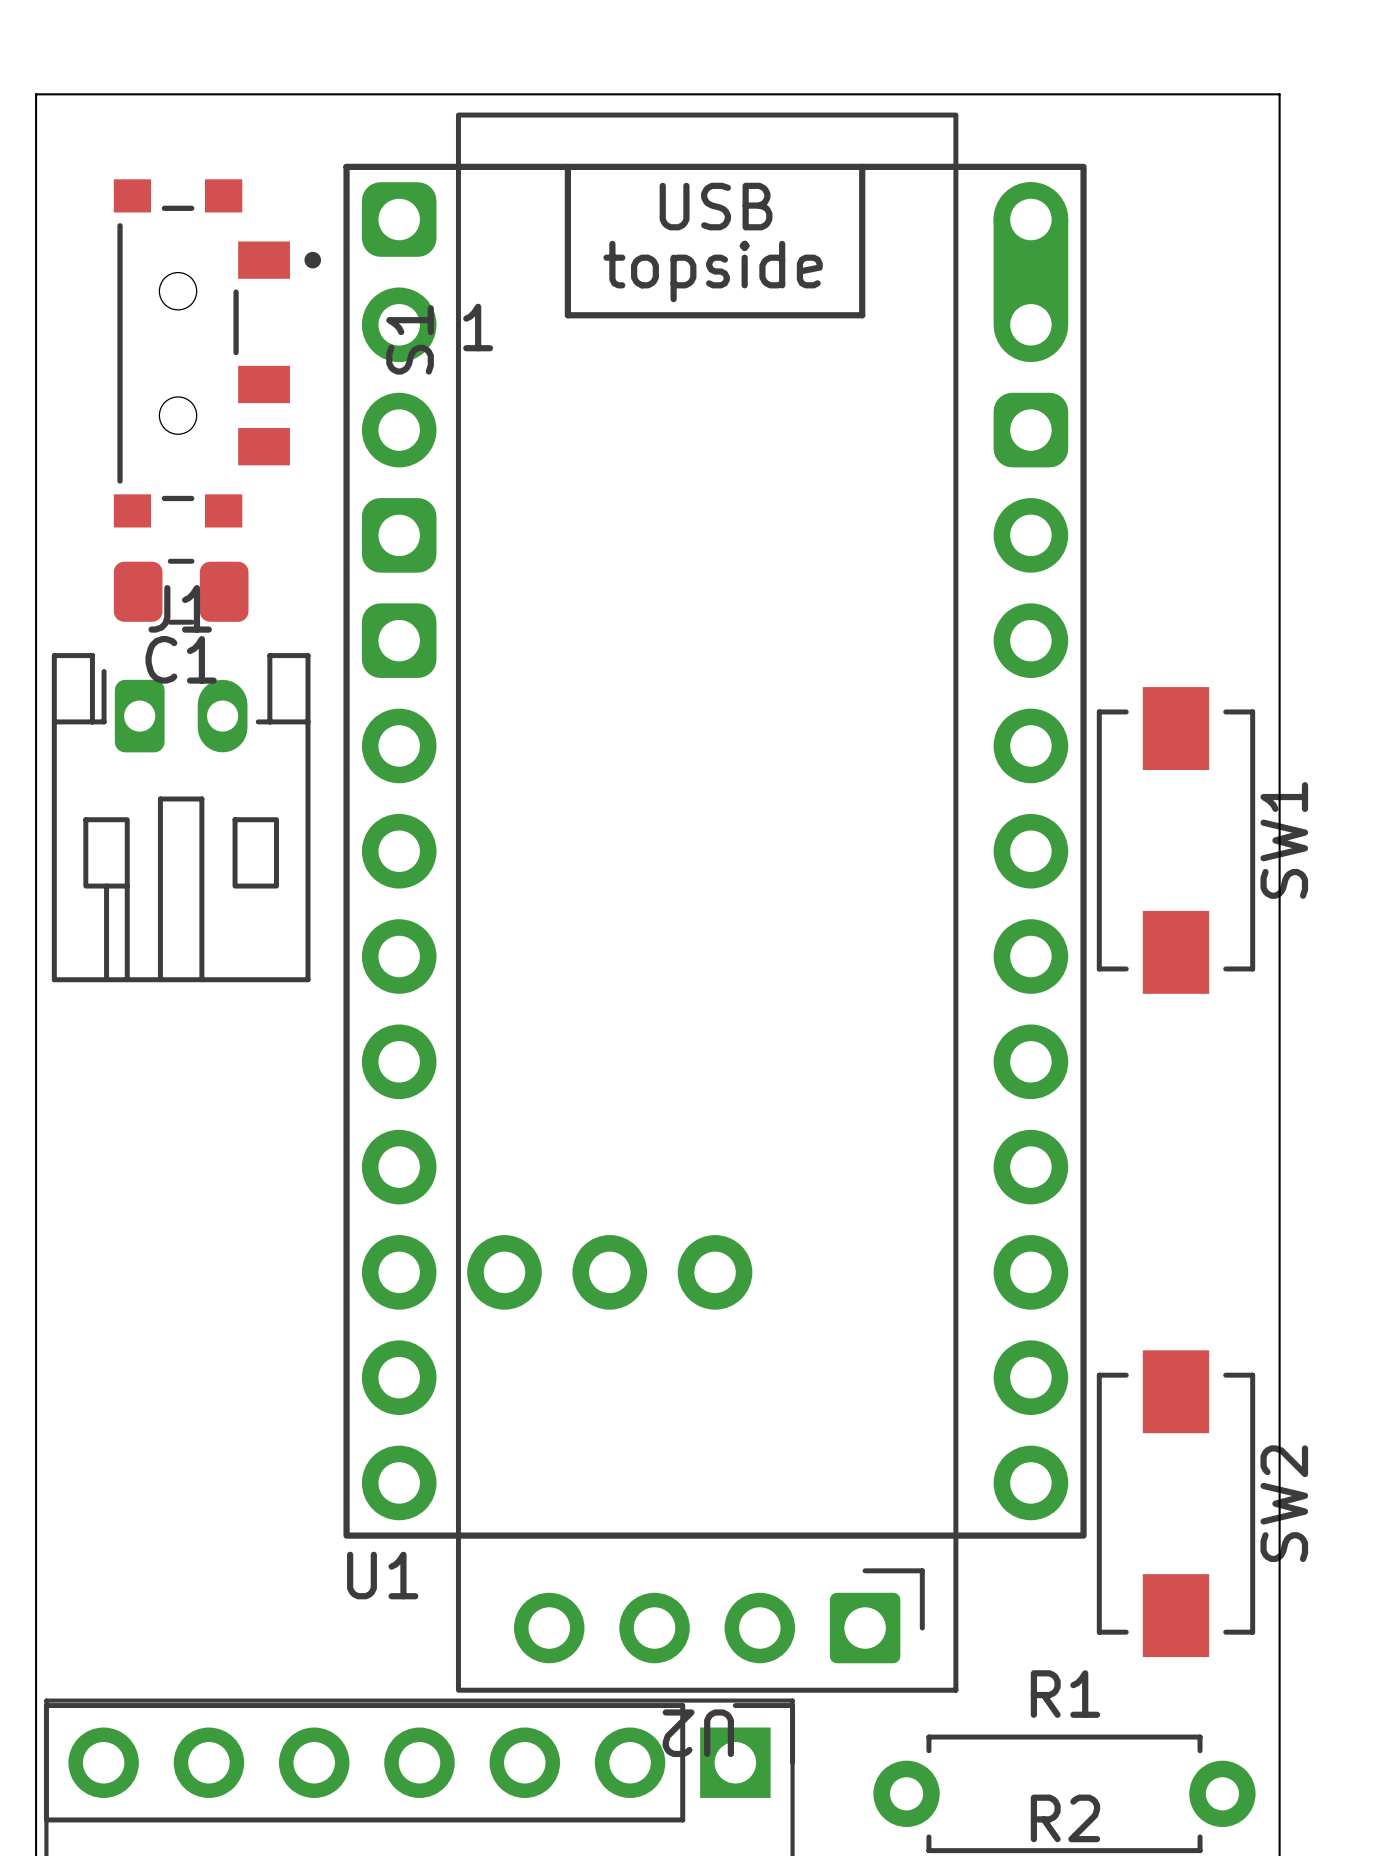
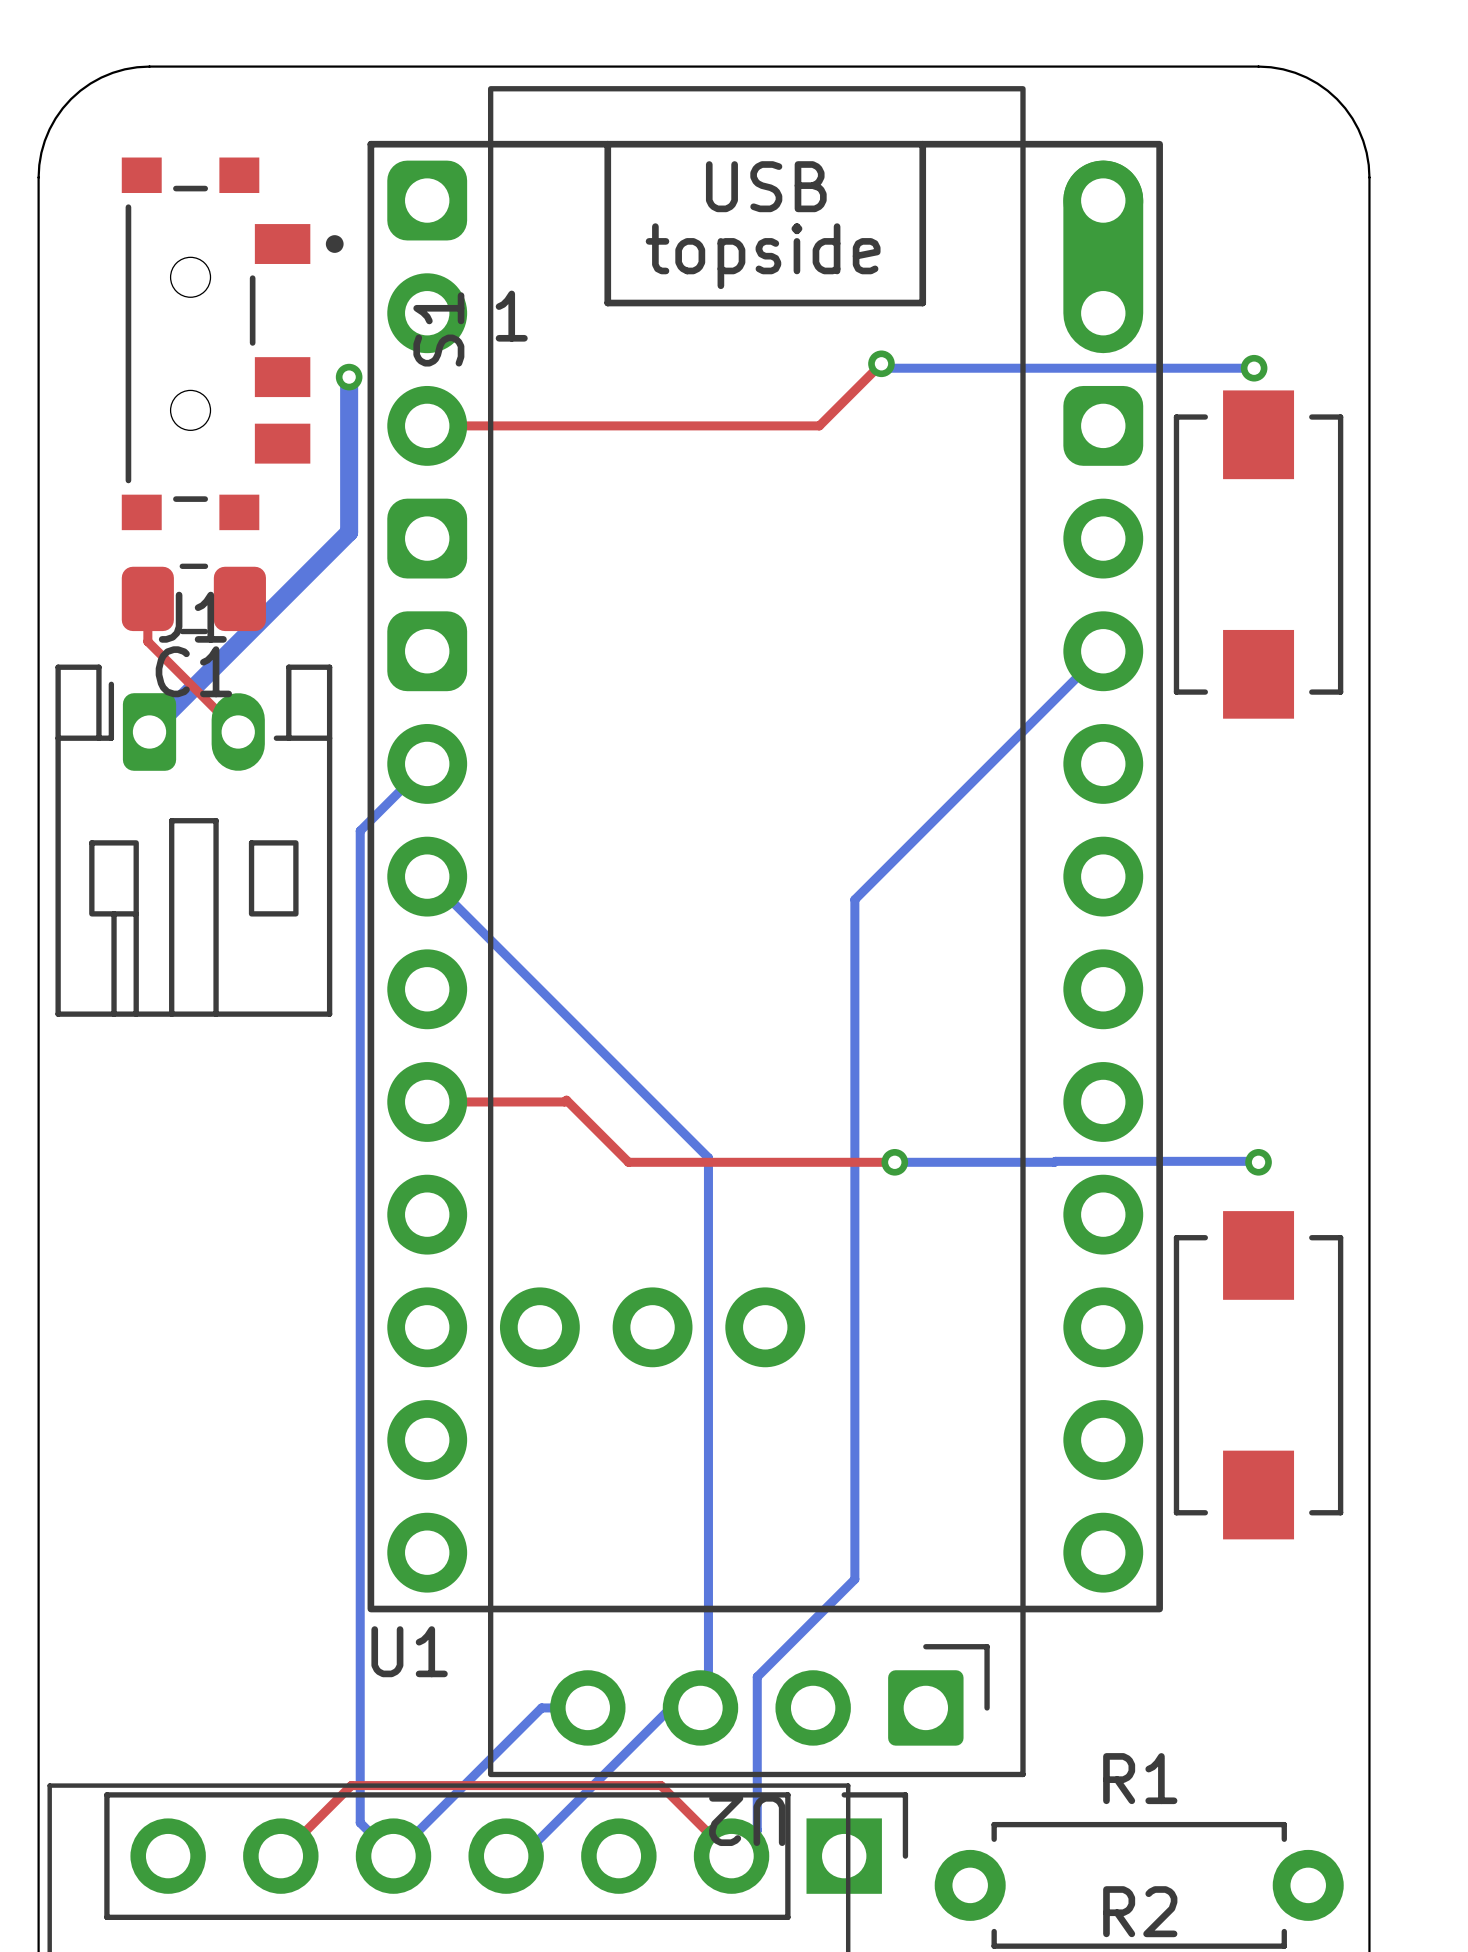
board edge: (139, 94) (36, 94) (36, 197) -> (149, 66) (112, 72) (90, 83) (71, 99) (55, 118) (44, 140) (38, 177)
board edge: (1175, 94) (1279, 94) (1279, 197) -> (1258, 66) (1295, 72) (1317, 83) (1336, 99) (1358, 129) (1366, 152) (1369, 177)
bottom track: none -> (881, 363) (885, 368) (1254, 368)
top track: none -> (881, 363) (819, 425) (427, 425)
via: none -> (881, 363)
via: none -> (1254, 368)
bottom track: none -> (349, 377) (349, 532) (149, 731)
via: none -> (349, 377)
part: none -> (1258, 554)
top track: none -> (147, 598) (147, 641) (238, 731)
bottom track: none -> (1103, 651) (854, 899) (854, 1579) (757, 1676) (757, 1830) (731, 1856)
bottom track: none -> (427, 763) (360, 830) (360, 1822) (393, 1856) (541, 1707) (587, 1707)
SW1: (1175, 840) -> none
bottom track: none -> (427, 876) (708, 1157) (708, 1699) (700, 1707) (670, 1707) (522, 1856) (506, 1856)
top track: none -> (427, 1101) (564, 1101) (566, 1100) (628, 1162) (894, 1162)
bottom track: none -> (894, 1162) (1258, 1162)
via: none -> (894, 1162)
via: none -> (1258, 1162)
part: none -> (1258, 1375)
SW2: (1175, 1503) -> none
part position: (419, 1762) -> (506, 1856)
top track: none -> (280, 1856) (351, 1785) (661, 1785) (731, 1856)

